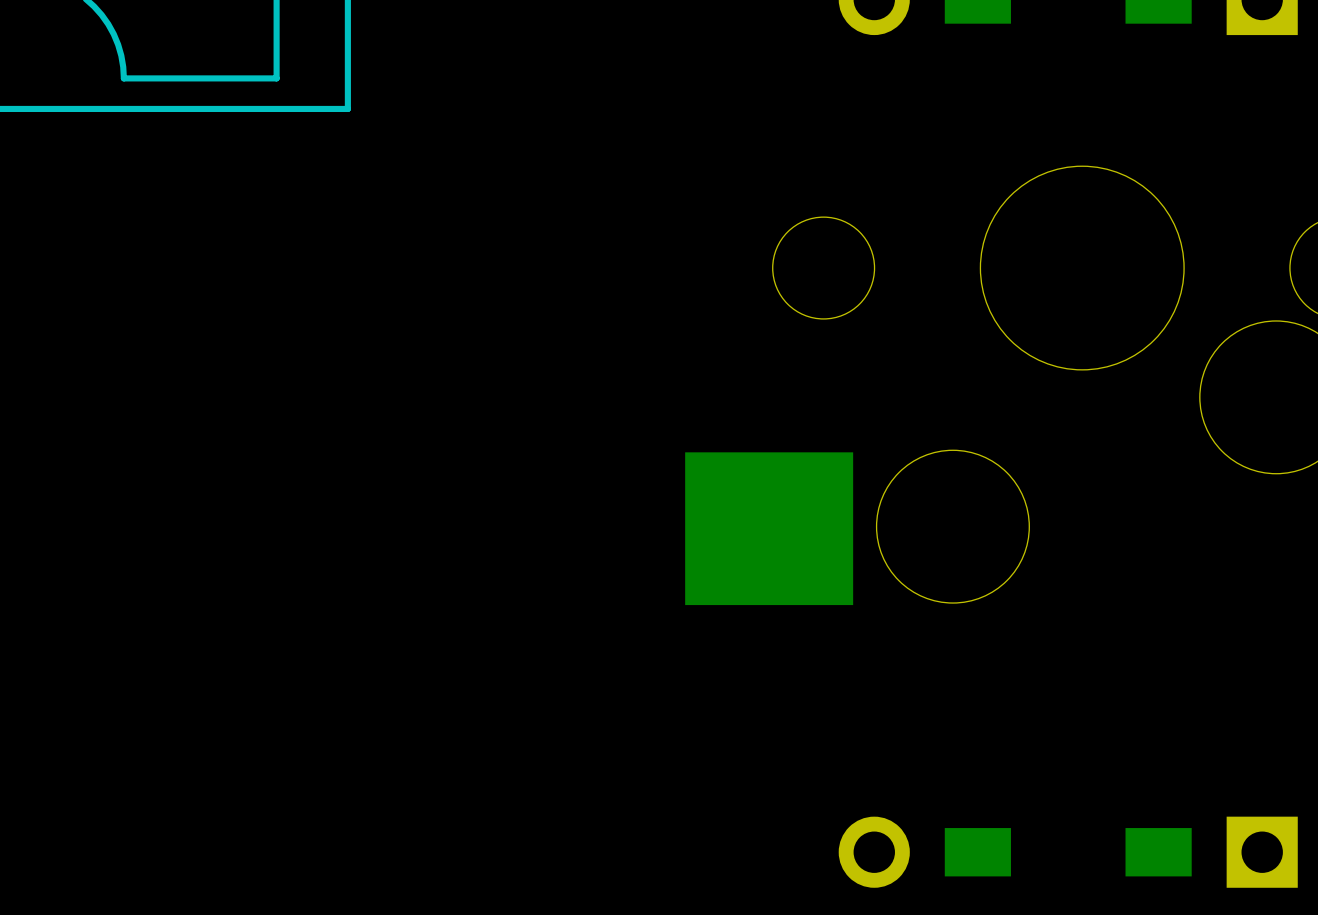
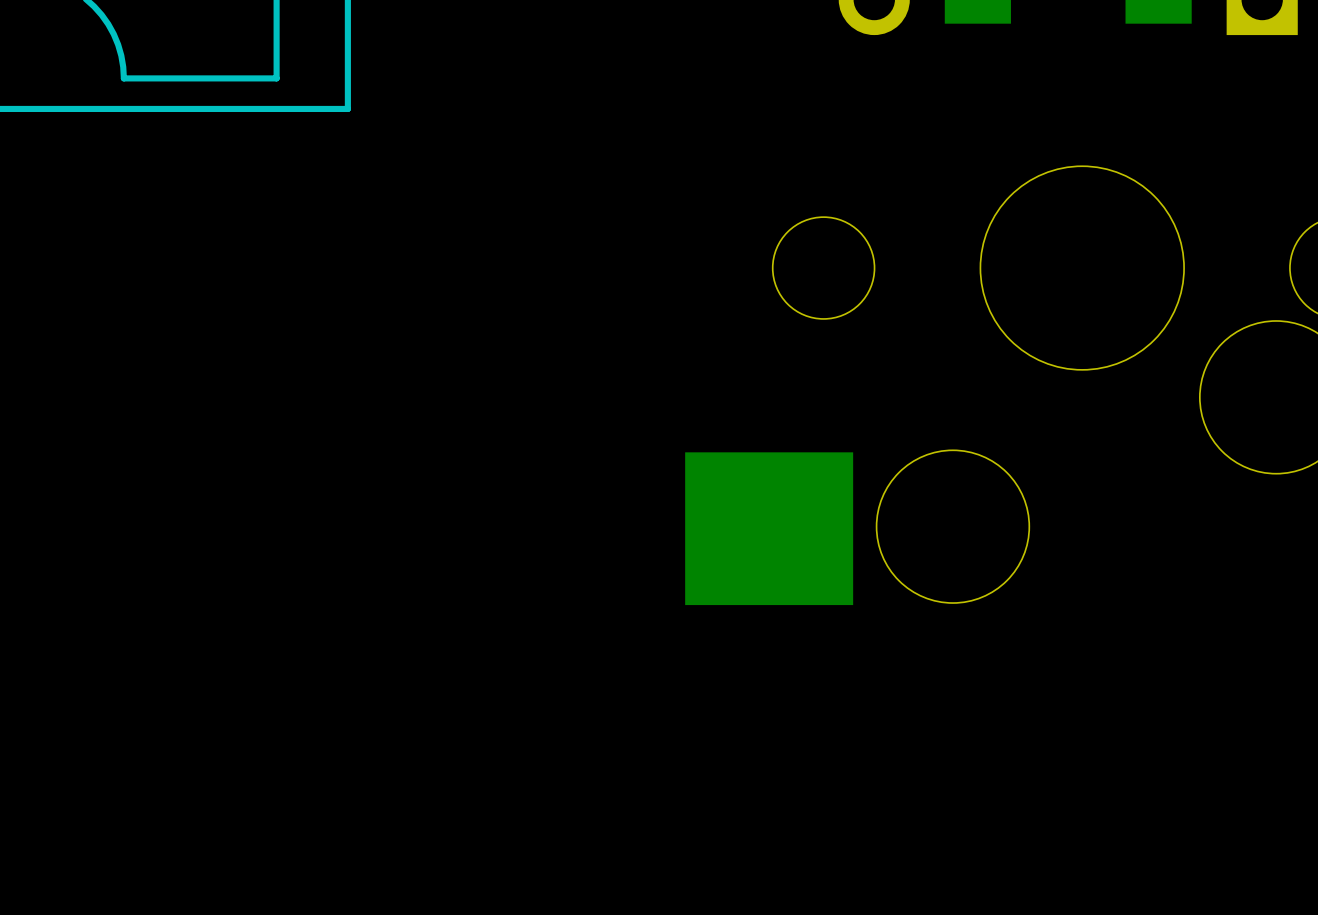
part: (1068, 852) -> none

